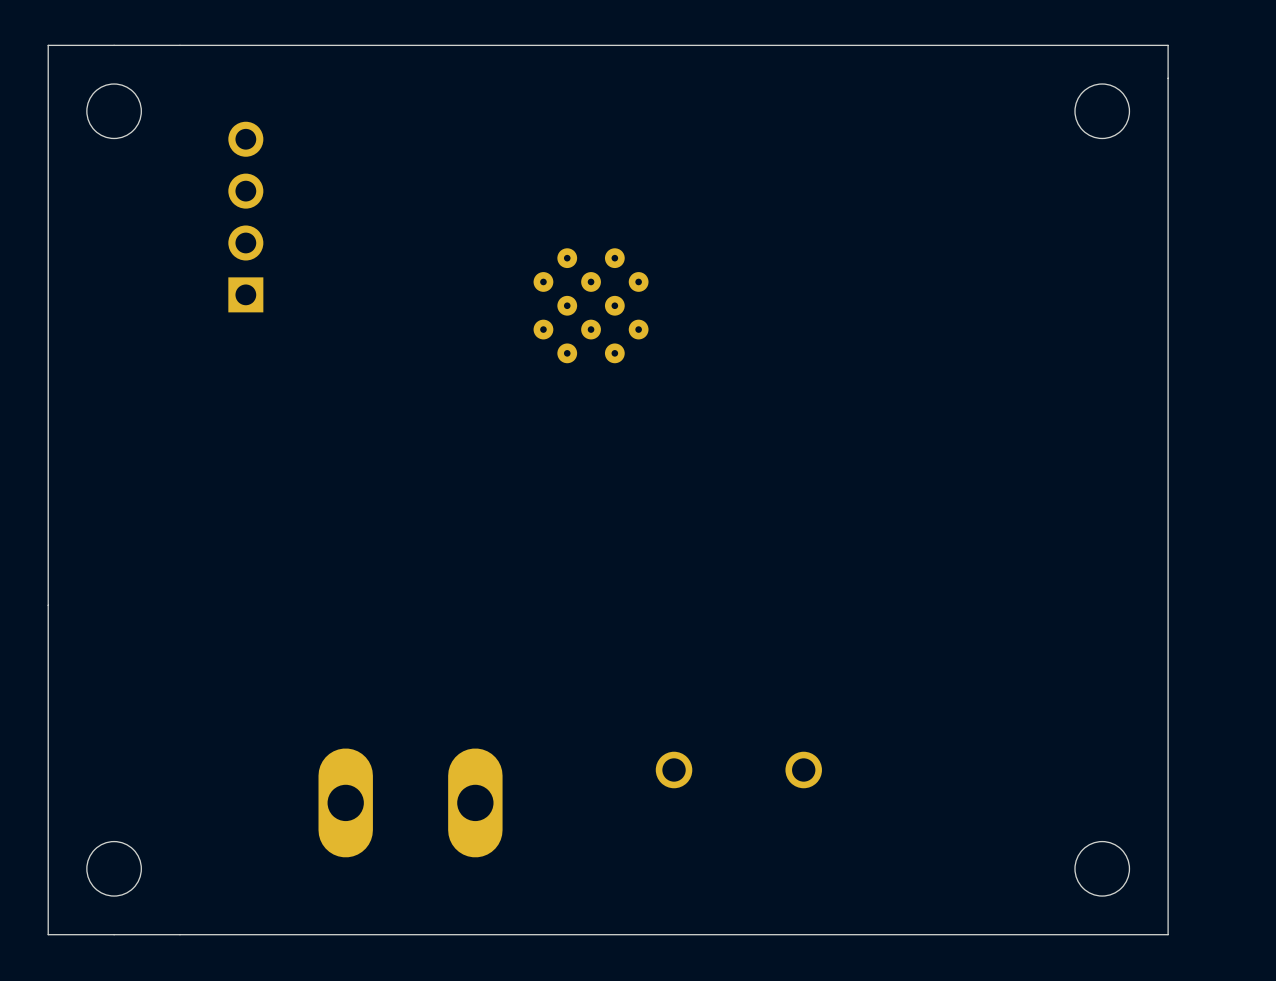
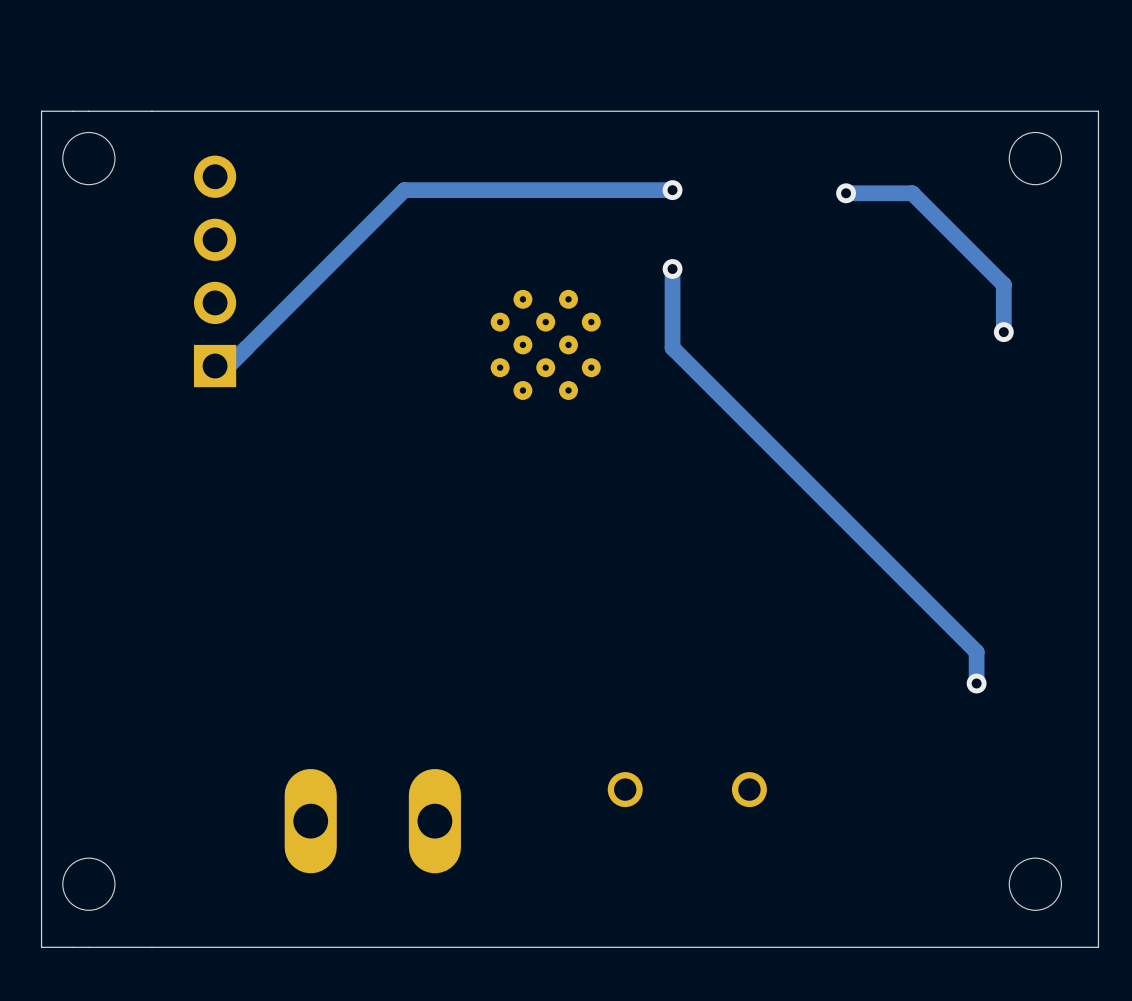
board edge: (1168, 61) (1168, 45) (48, 45) (48, 934) (64, 934) -> (1098, 111) (41, 111) (41, 947)
part footprint: [228, 121, 264, 313] -> [193, 155, 237, 388]
track: none -> (672, 190) (404, 190) (228, 366) (215, 366)
via: none -> (672, 190)
track: none -> (846, 193) (912, 193) (1003, 284) (1003, 332)
via: none -> (846, 193)
track: none -> (672, 269) (672, 347) (976, 651) (976, 683)
via: none -> (672, 269)
via: none -> (1003, 332)
via: none -> (976, 683)

